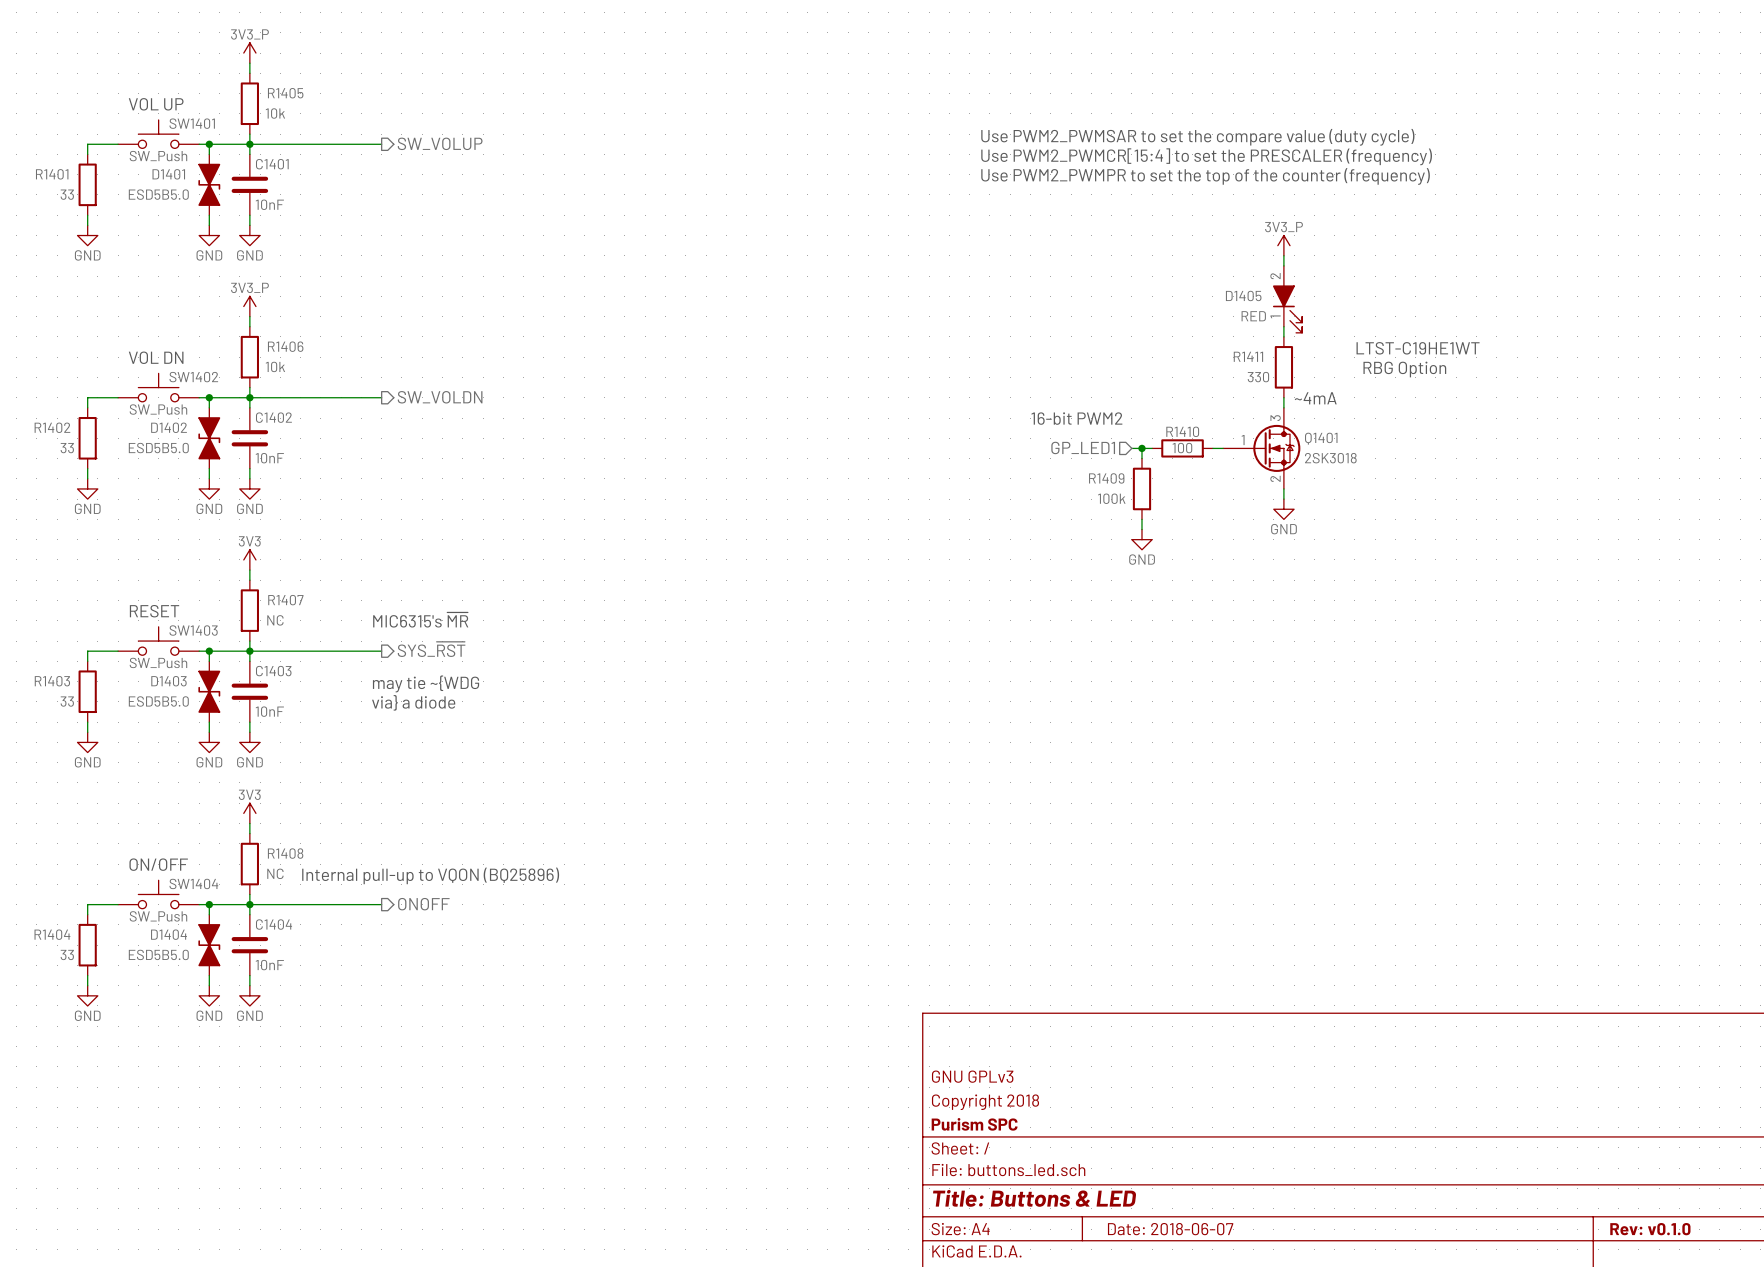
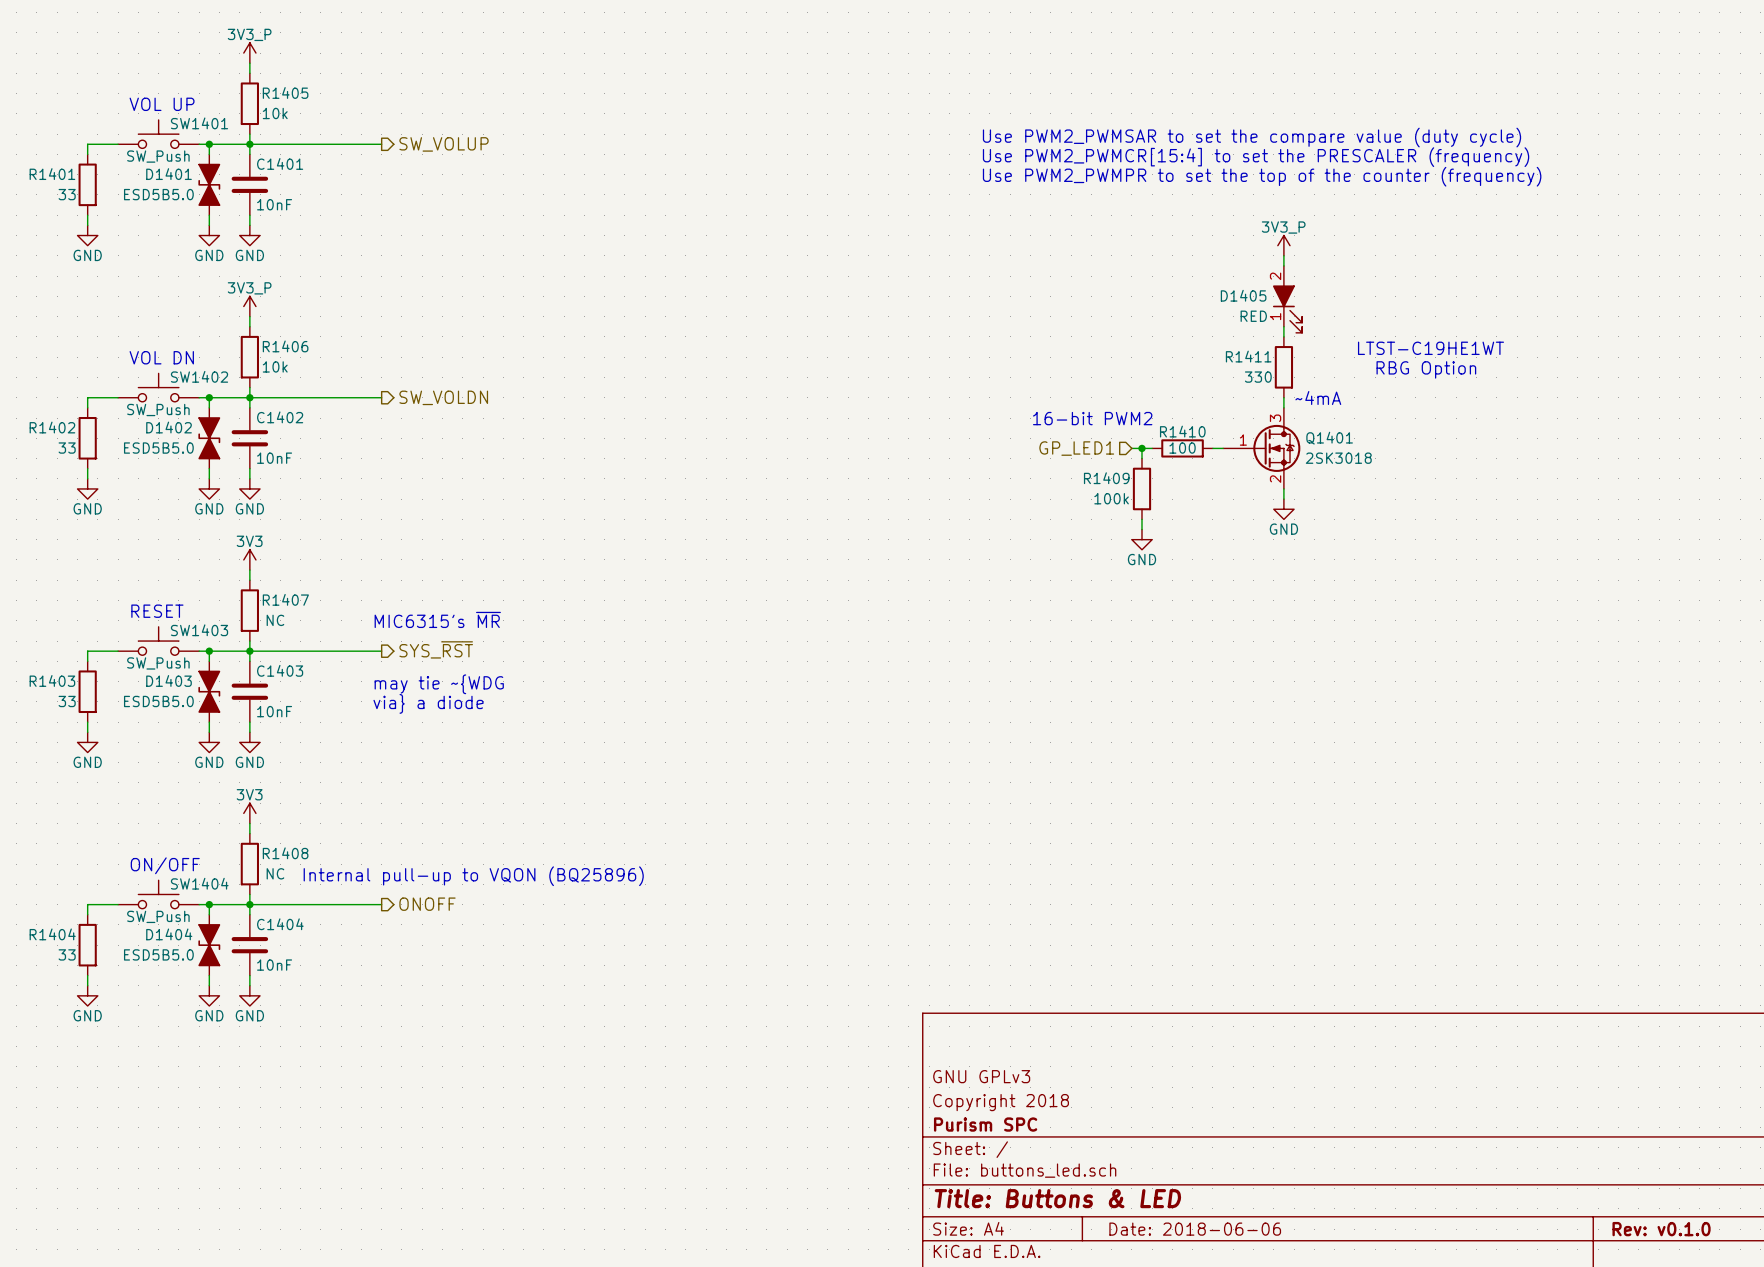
title block: Date: 2018-06-07 (1170, 1229) -> Date: 2018-06-06 (1195, 1229)

